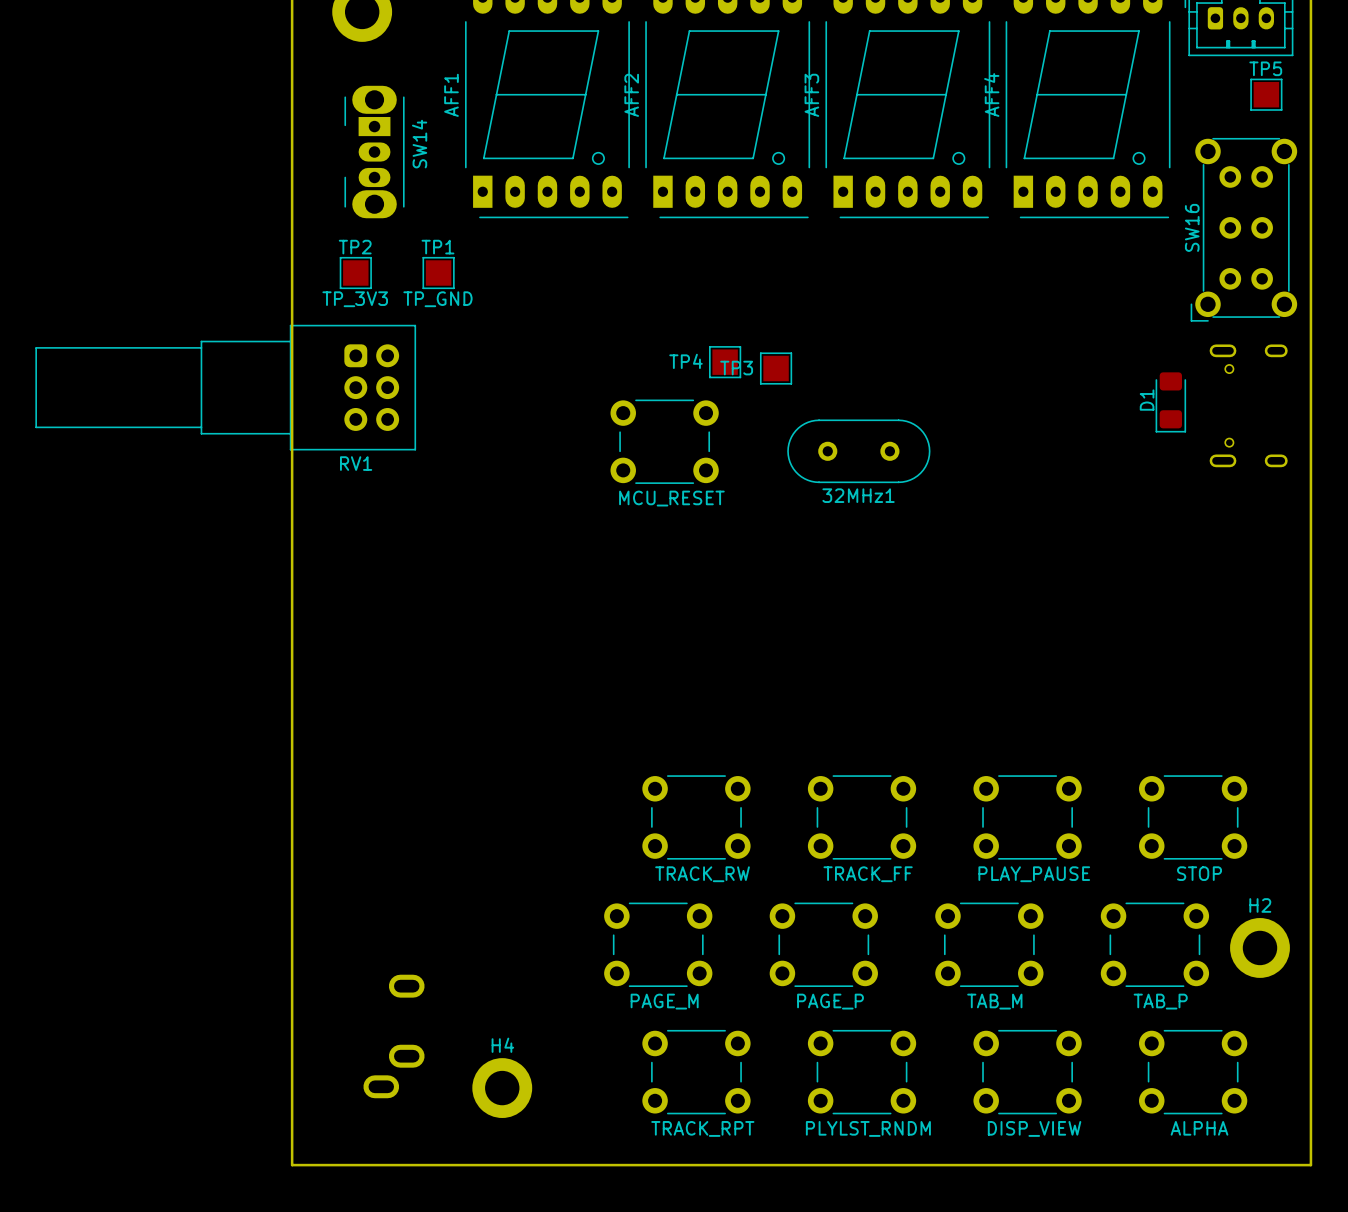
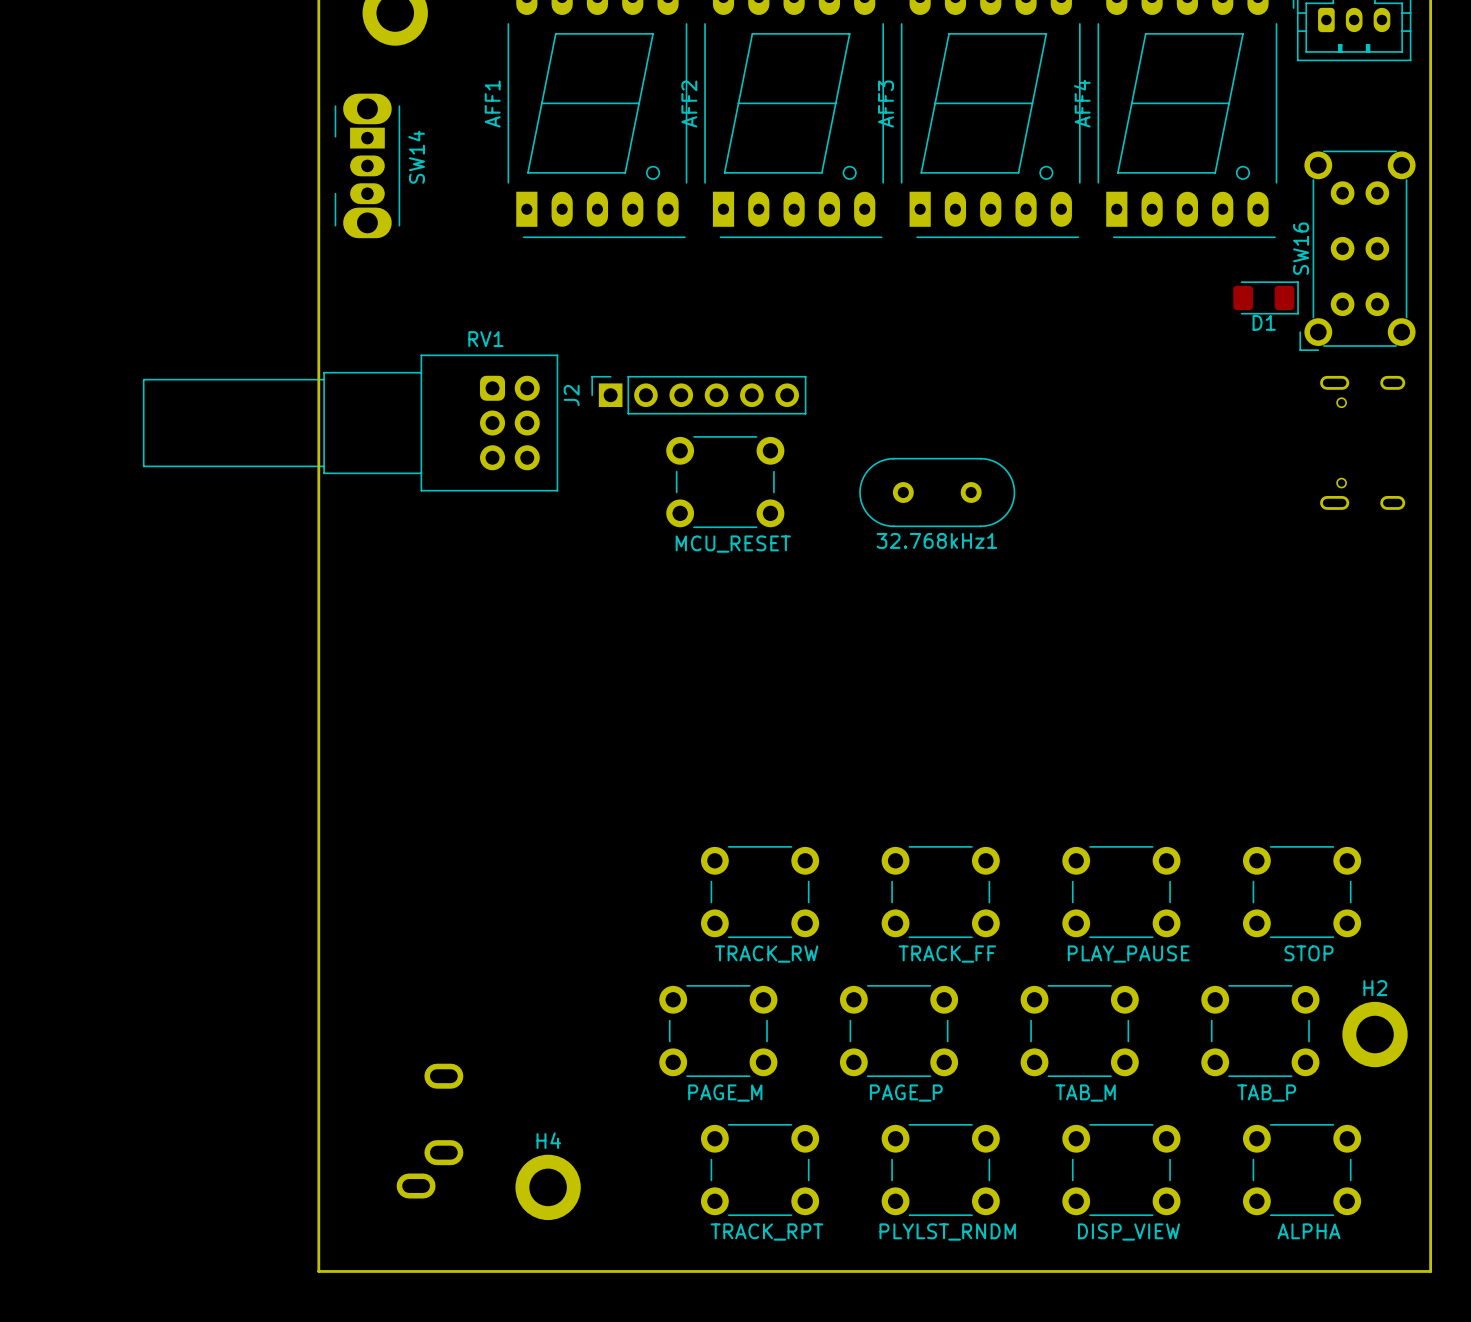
TP5: (1266, 94) -> none
SW14 position: (374, 152) -> (367, 165)
TP2: TP_3V3 (355, 273) -> none
TP1: TP_GND (438, 273) -> none
J2: none -> (698, 395)
TP4: (725, 362) -> none
TP3: (776, 368) -> none
RV1 position: (225, 387) -> (350, 423)
D1 rotation: 0° (1170, 402) -> 90° counterclockwise (1266, 297)
D1 position: (1170, 402) -> (1266, 297)
RV1 name position: RV1 (356, 463) -> RV1 (485, 339)
32MHz1 name: 32MHz1 (858, 495) -> 32.768kHz1 (936, 540)

